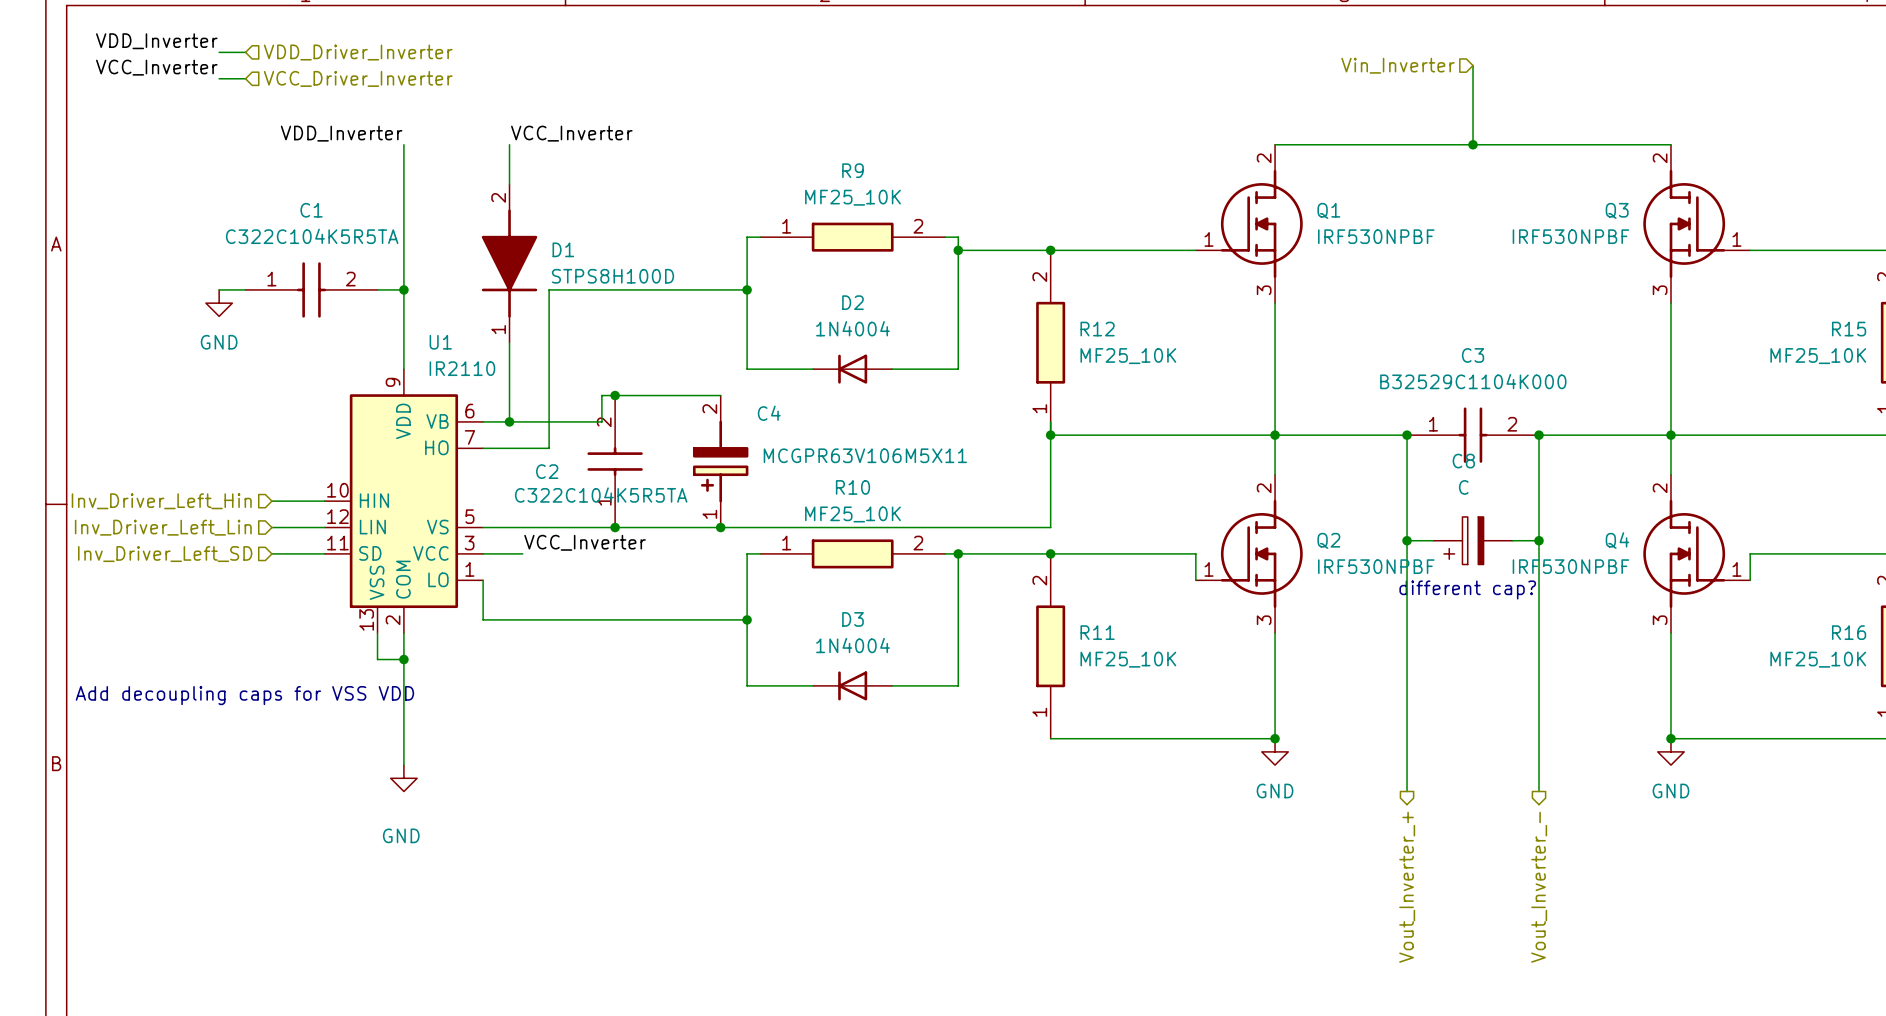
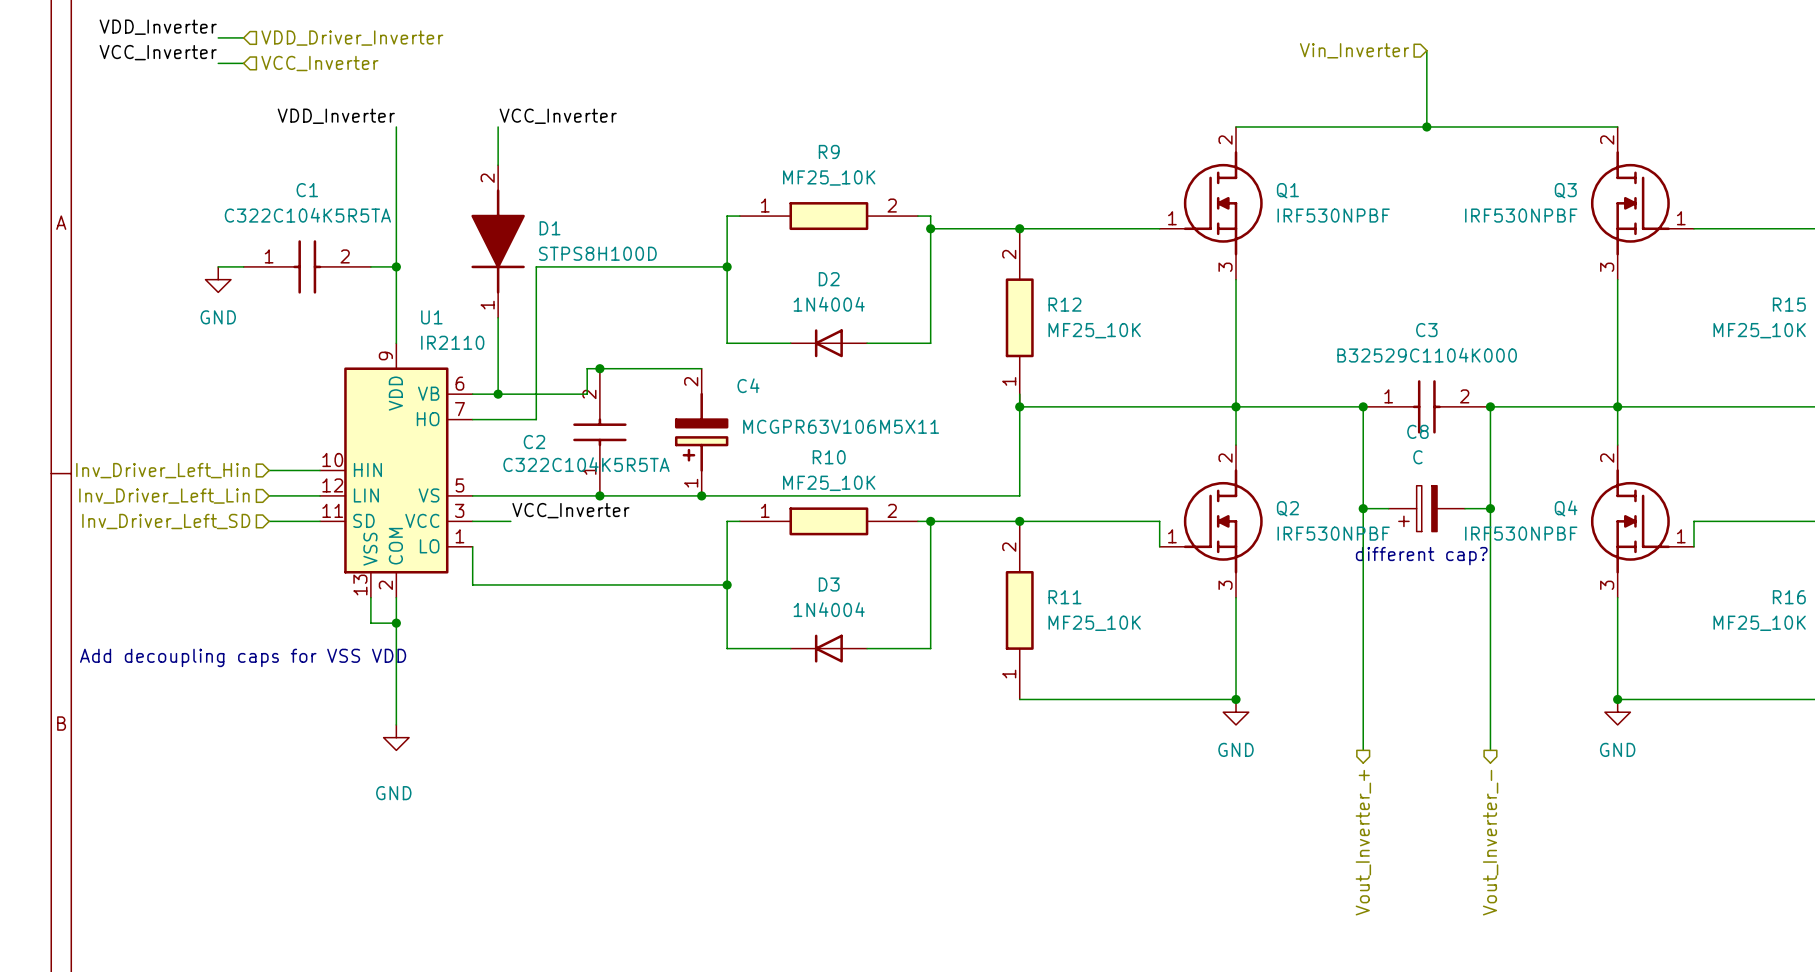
hierarchical label: VCC_Driver_Inverter (358, 78) -> VCC_Inverter (319, 63)

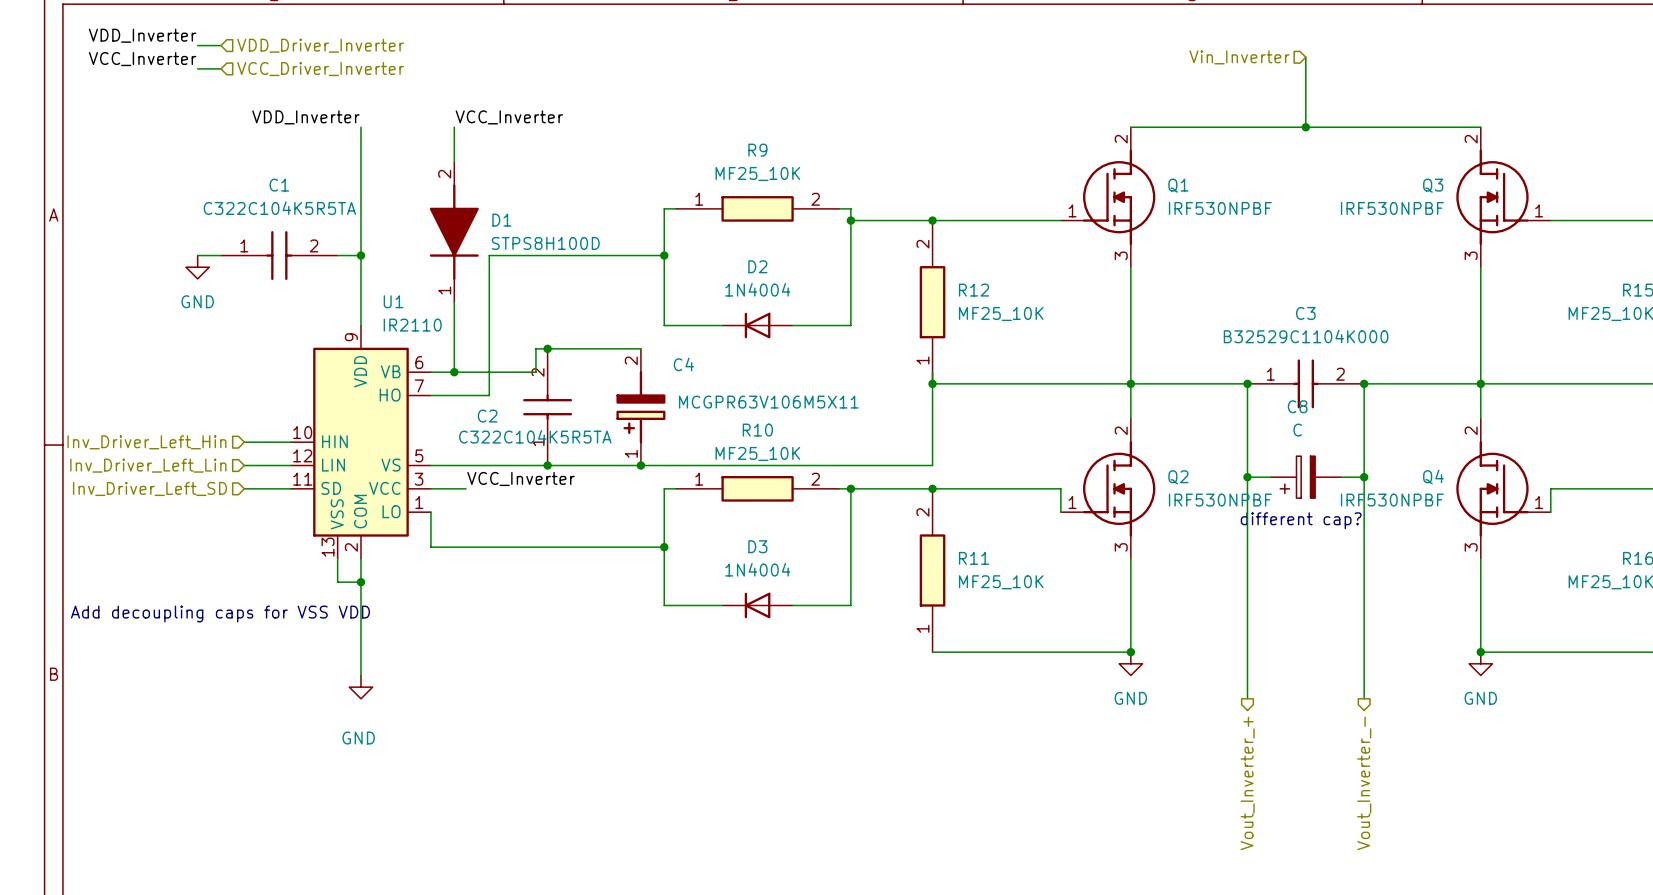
hierarchical label: VCC_Inverter (319, 63) -> VCC_Driver_Inverter (320, 69)

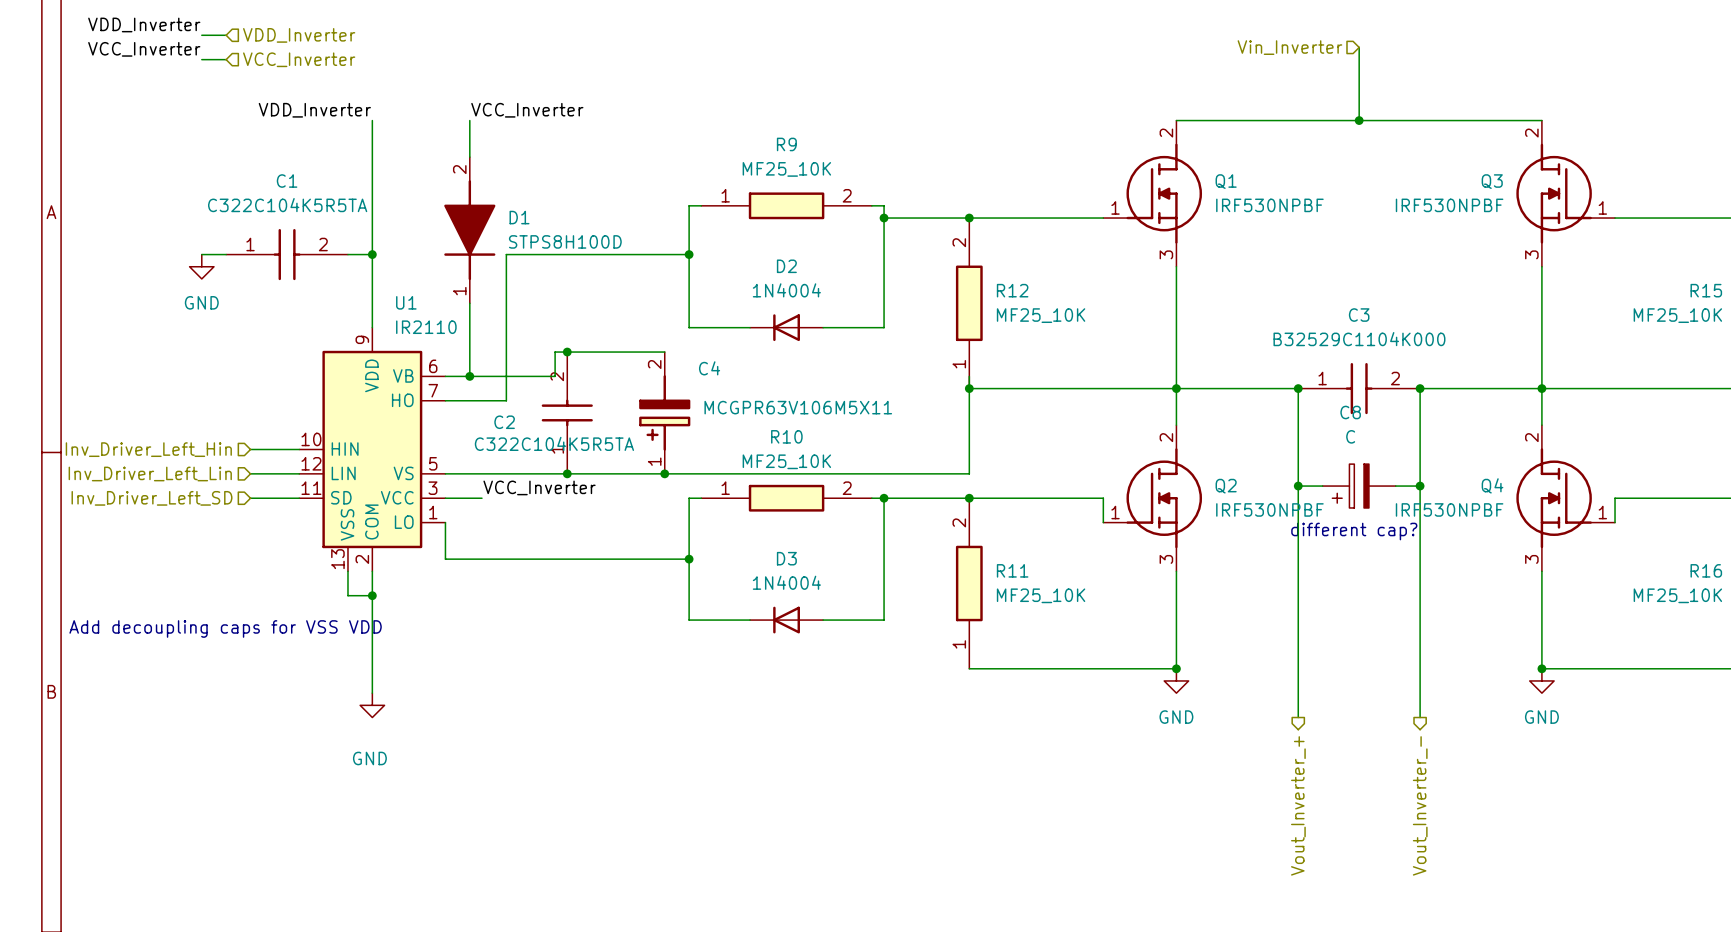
hierarchical label: VDD_Driver_Inverter (320, 45) -> VDD_Inverter (299, 35)
hierarchical label: VCC_Driver_Inverter (320, 69) -> VCC_Inverter (299, 59)

